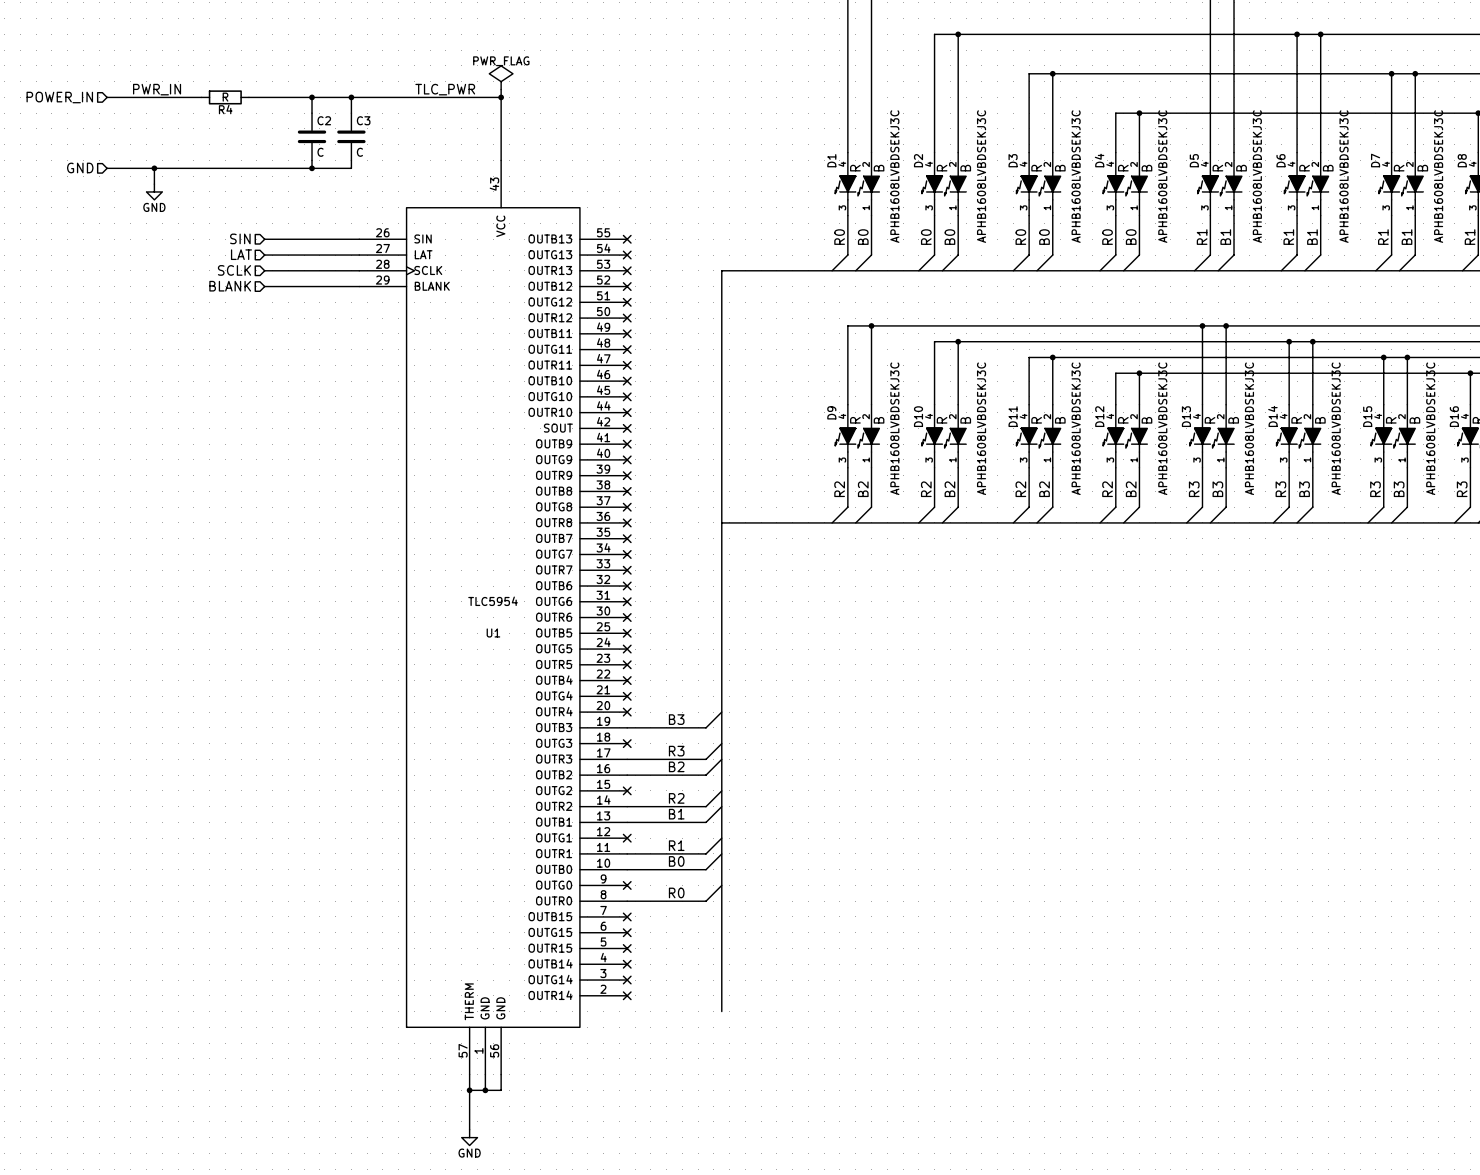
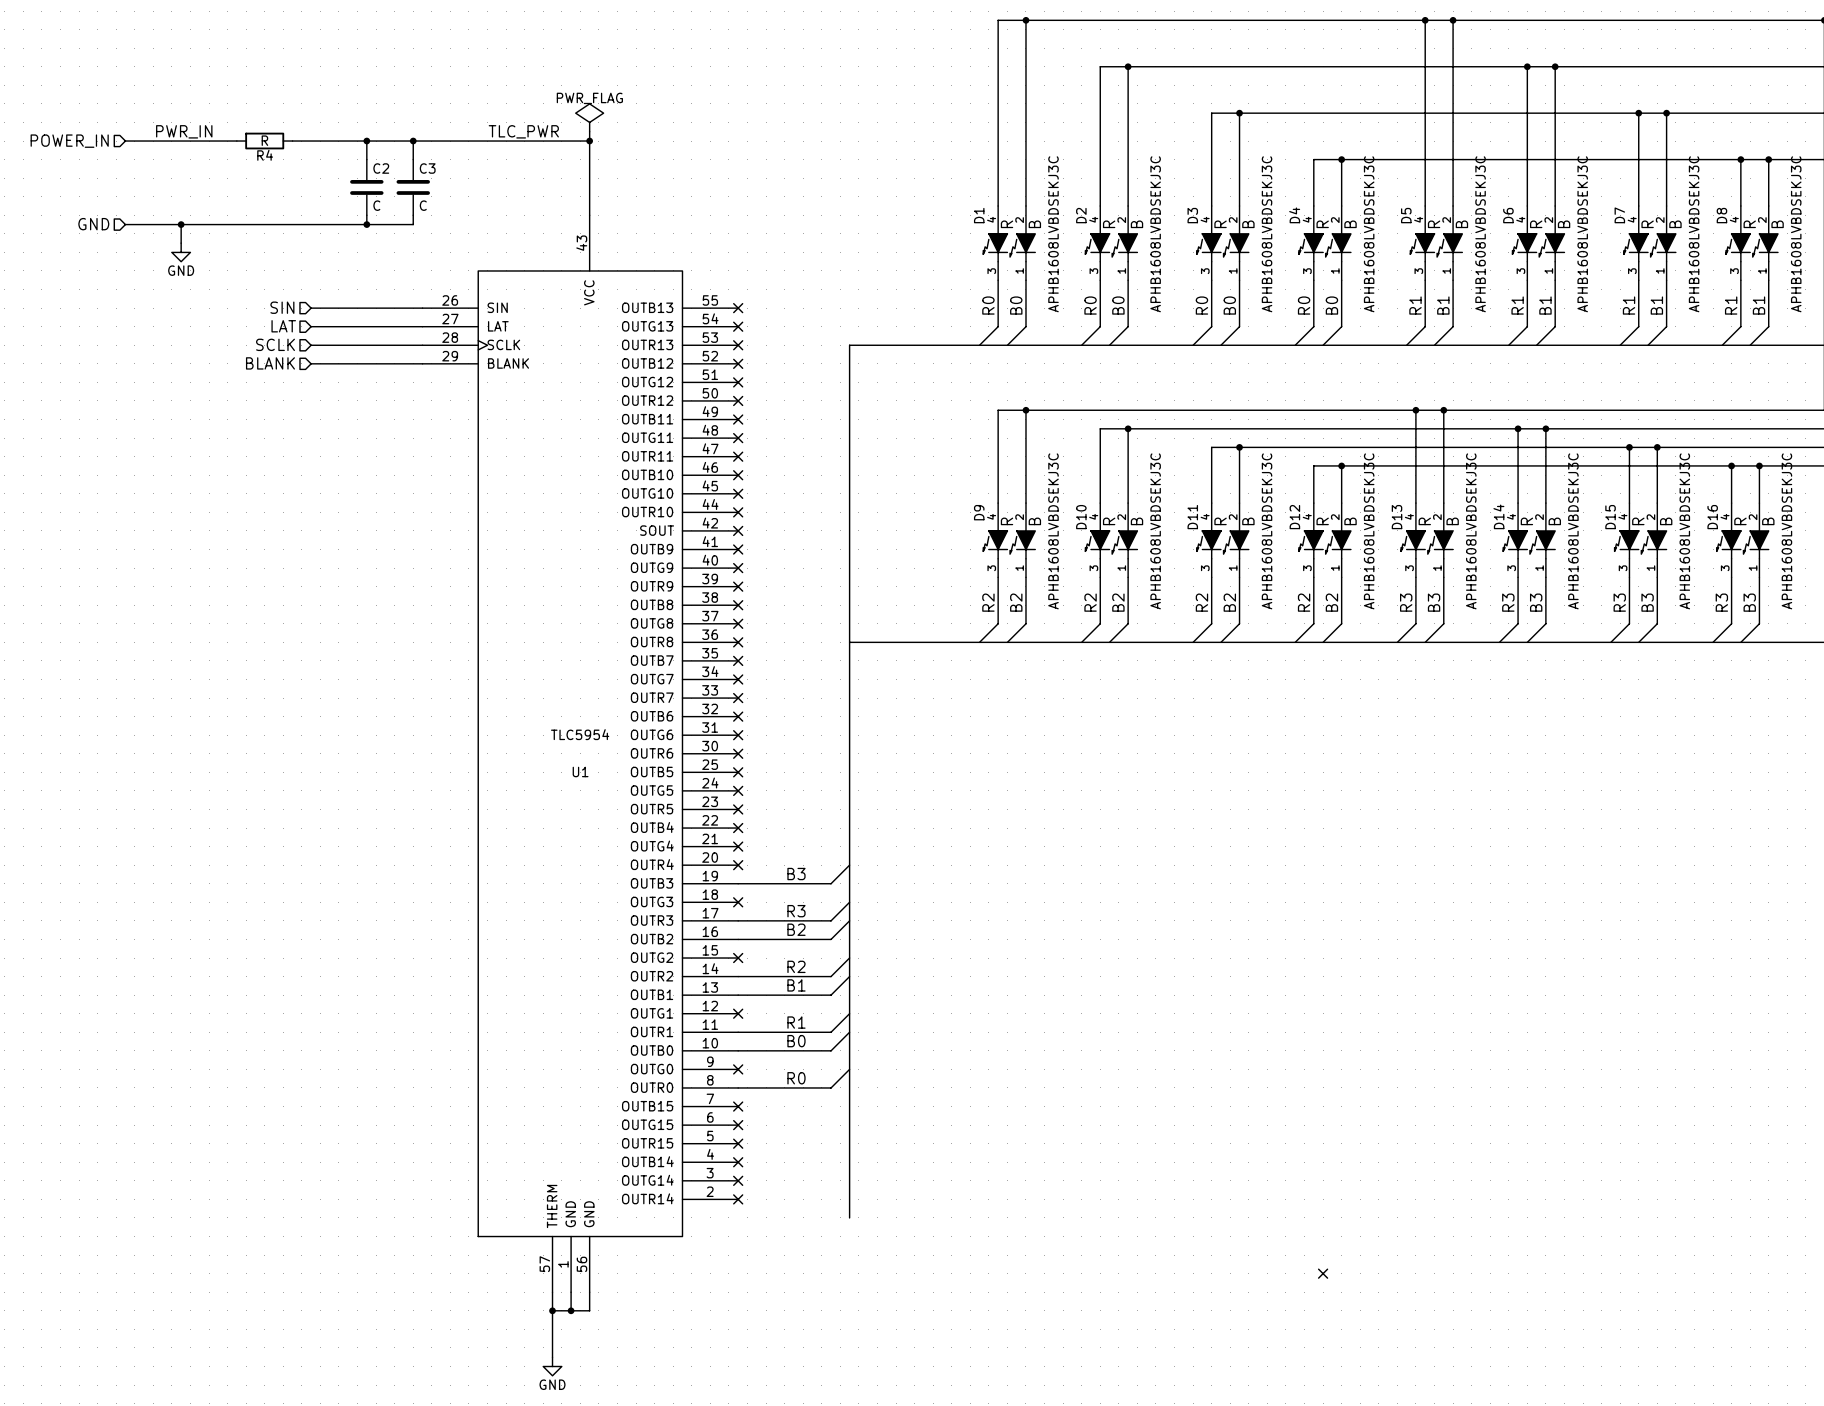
no-connect mark: none -> (1323, 1273)

